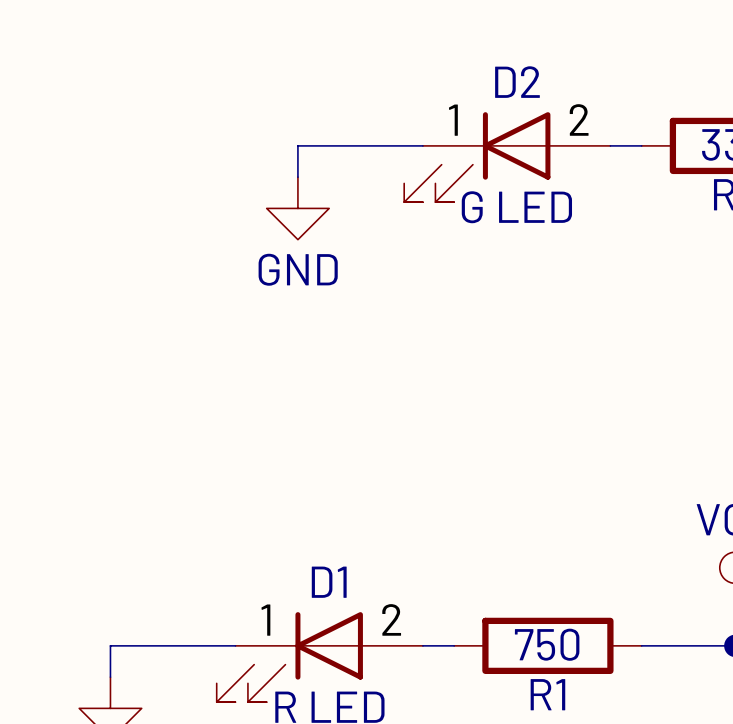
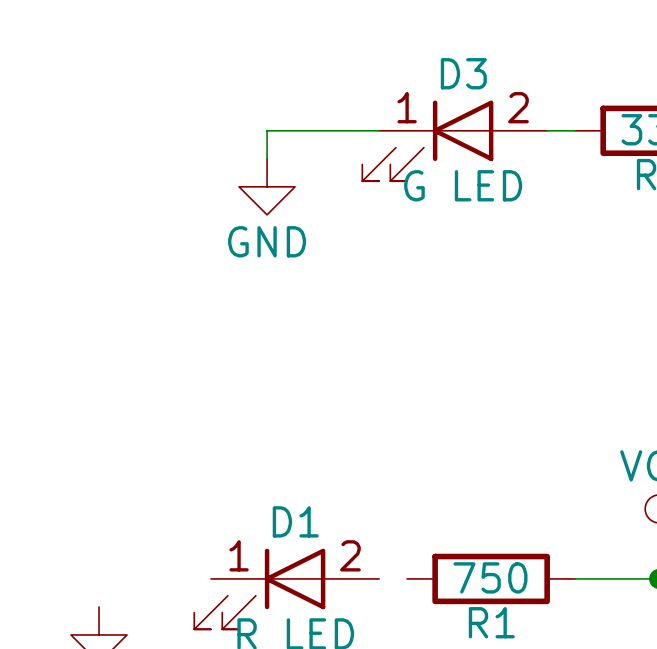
D2 name: D2 (517, 82) -> D3 (463, 73)
wire: (235, 645) (110, 645) (110, 677) -> none
wire: (422, 645) (454, 645) -> none

